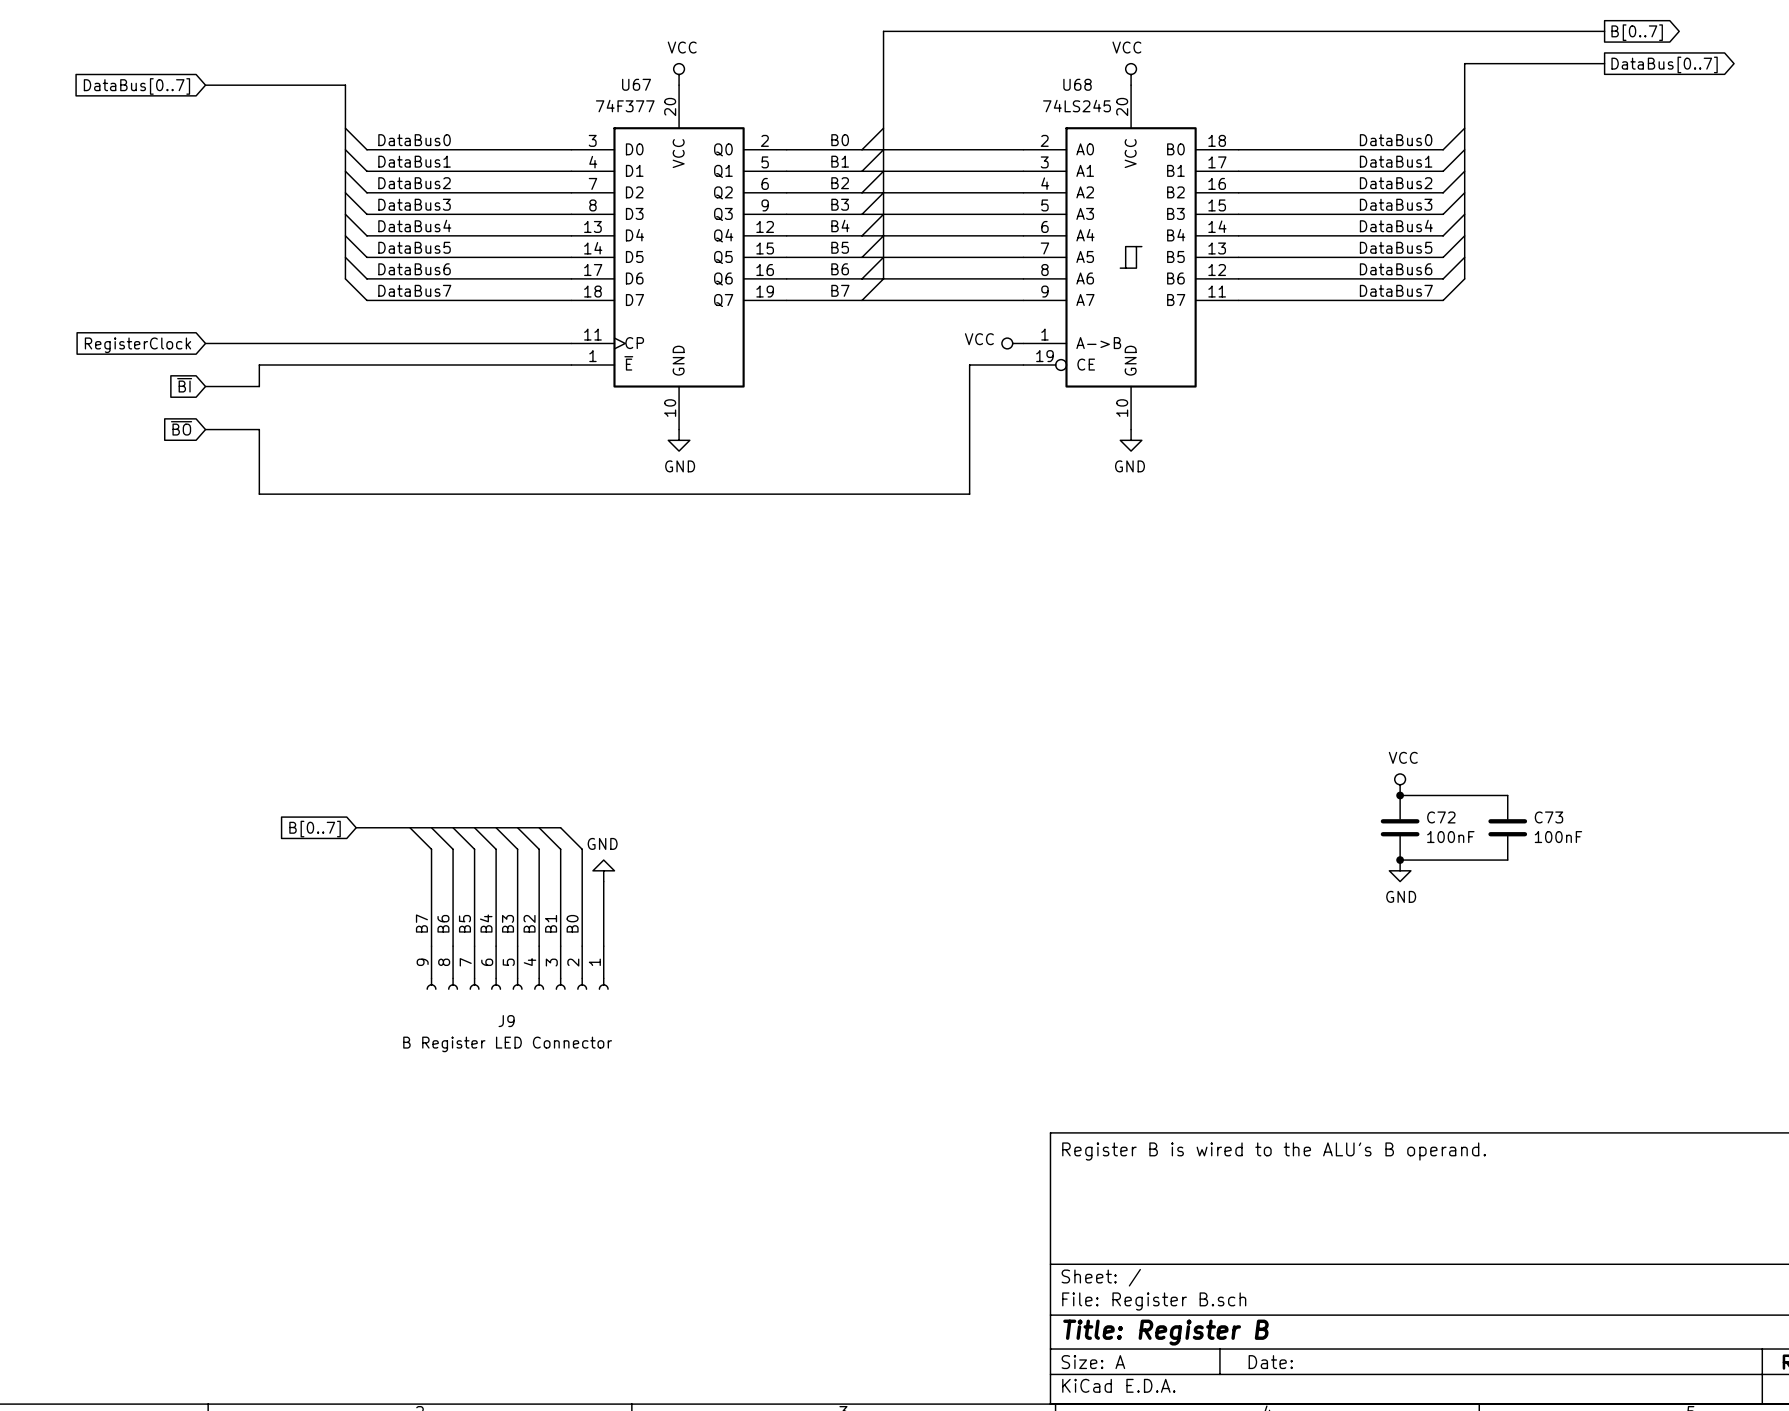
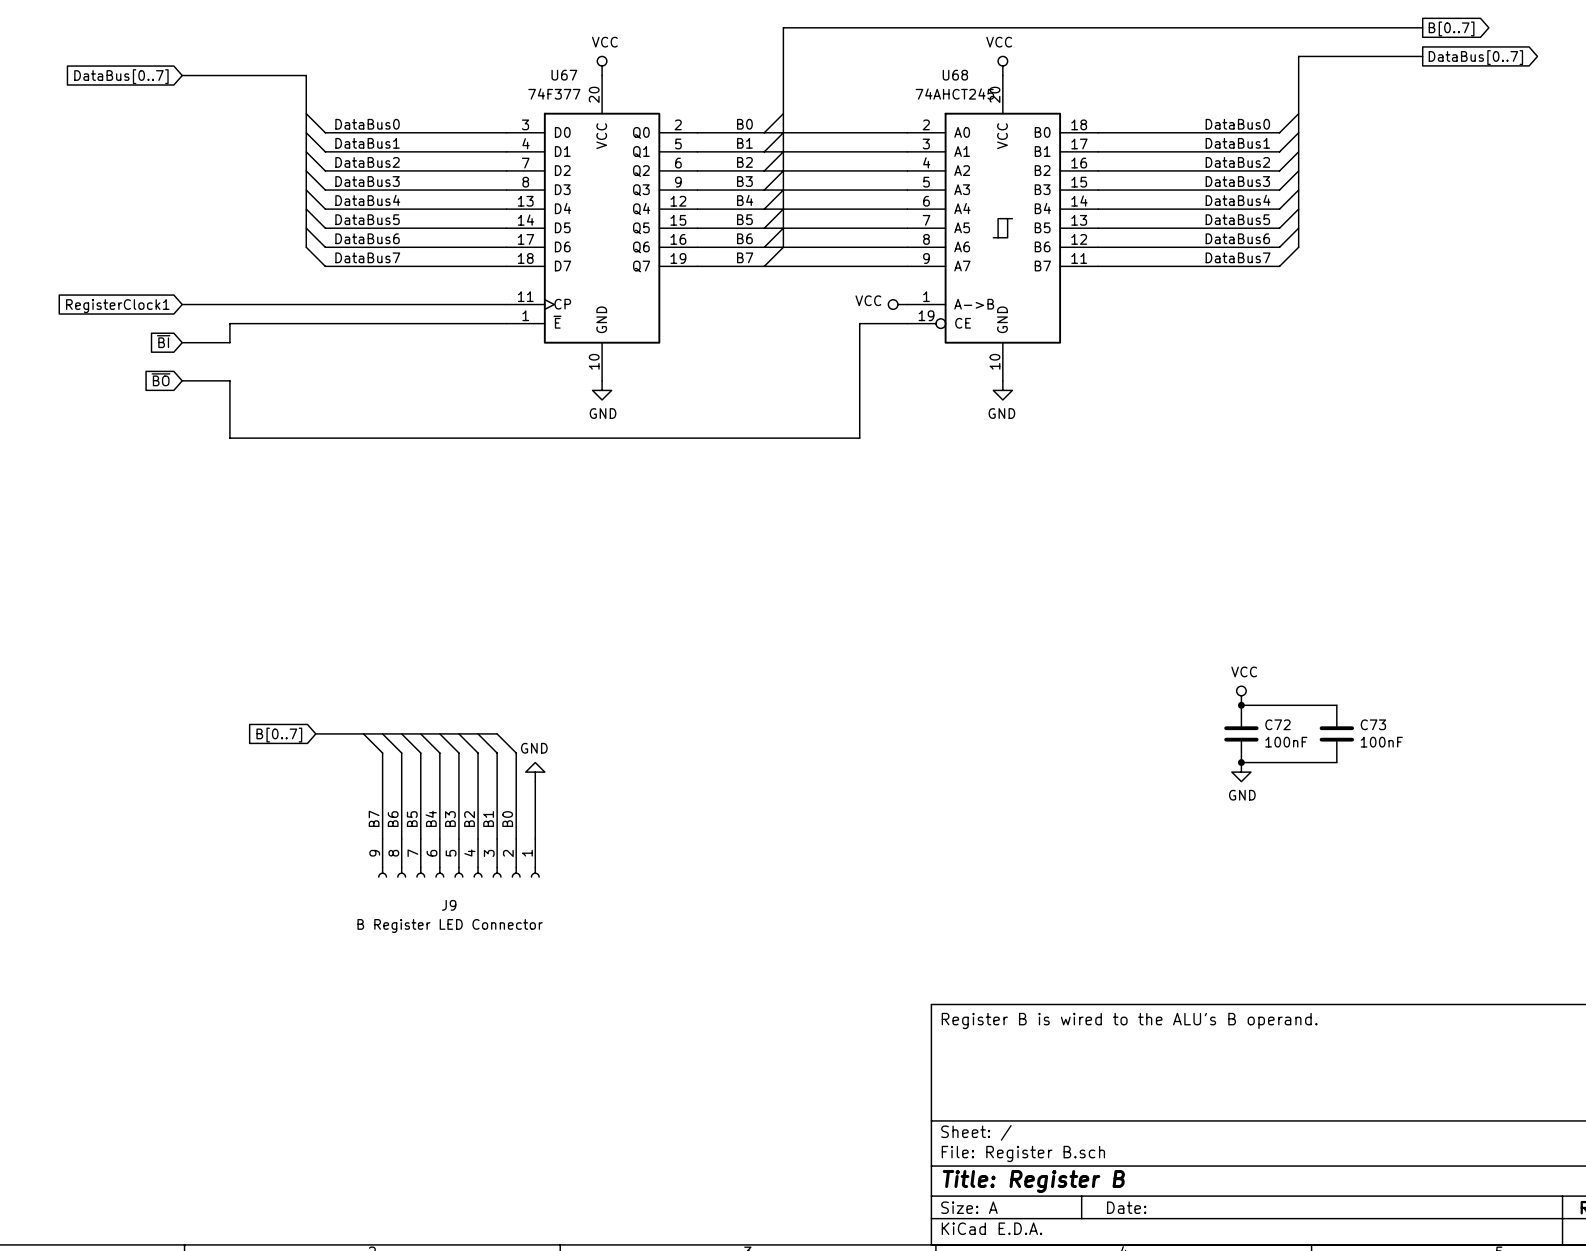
U68 value: 74LS245 (1077, 106) -> 74AHCT245 (954, 94)
global label: RegisterClock (137, 345) -> RegisterClock1 (117, 306)

